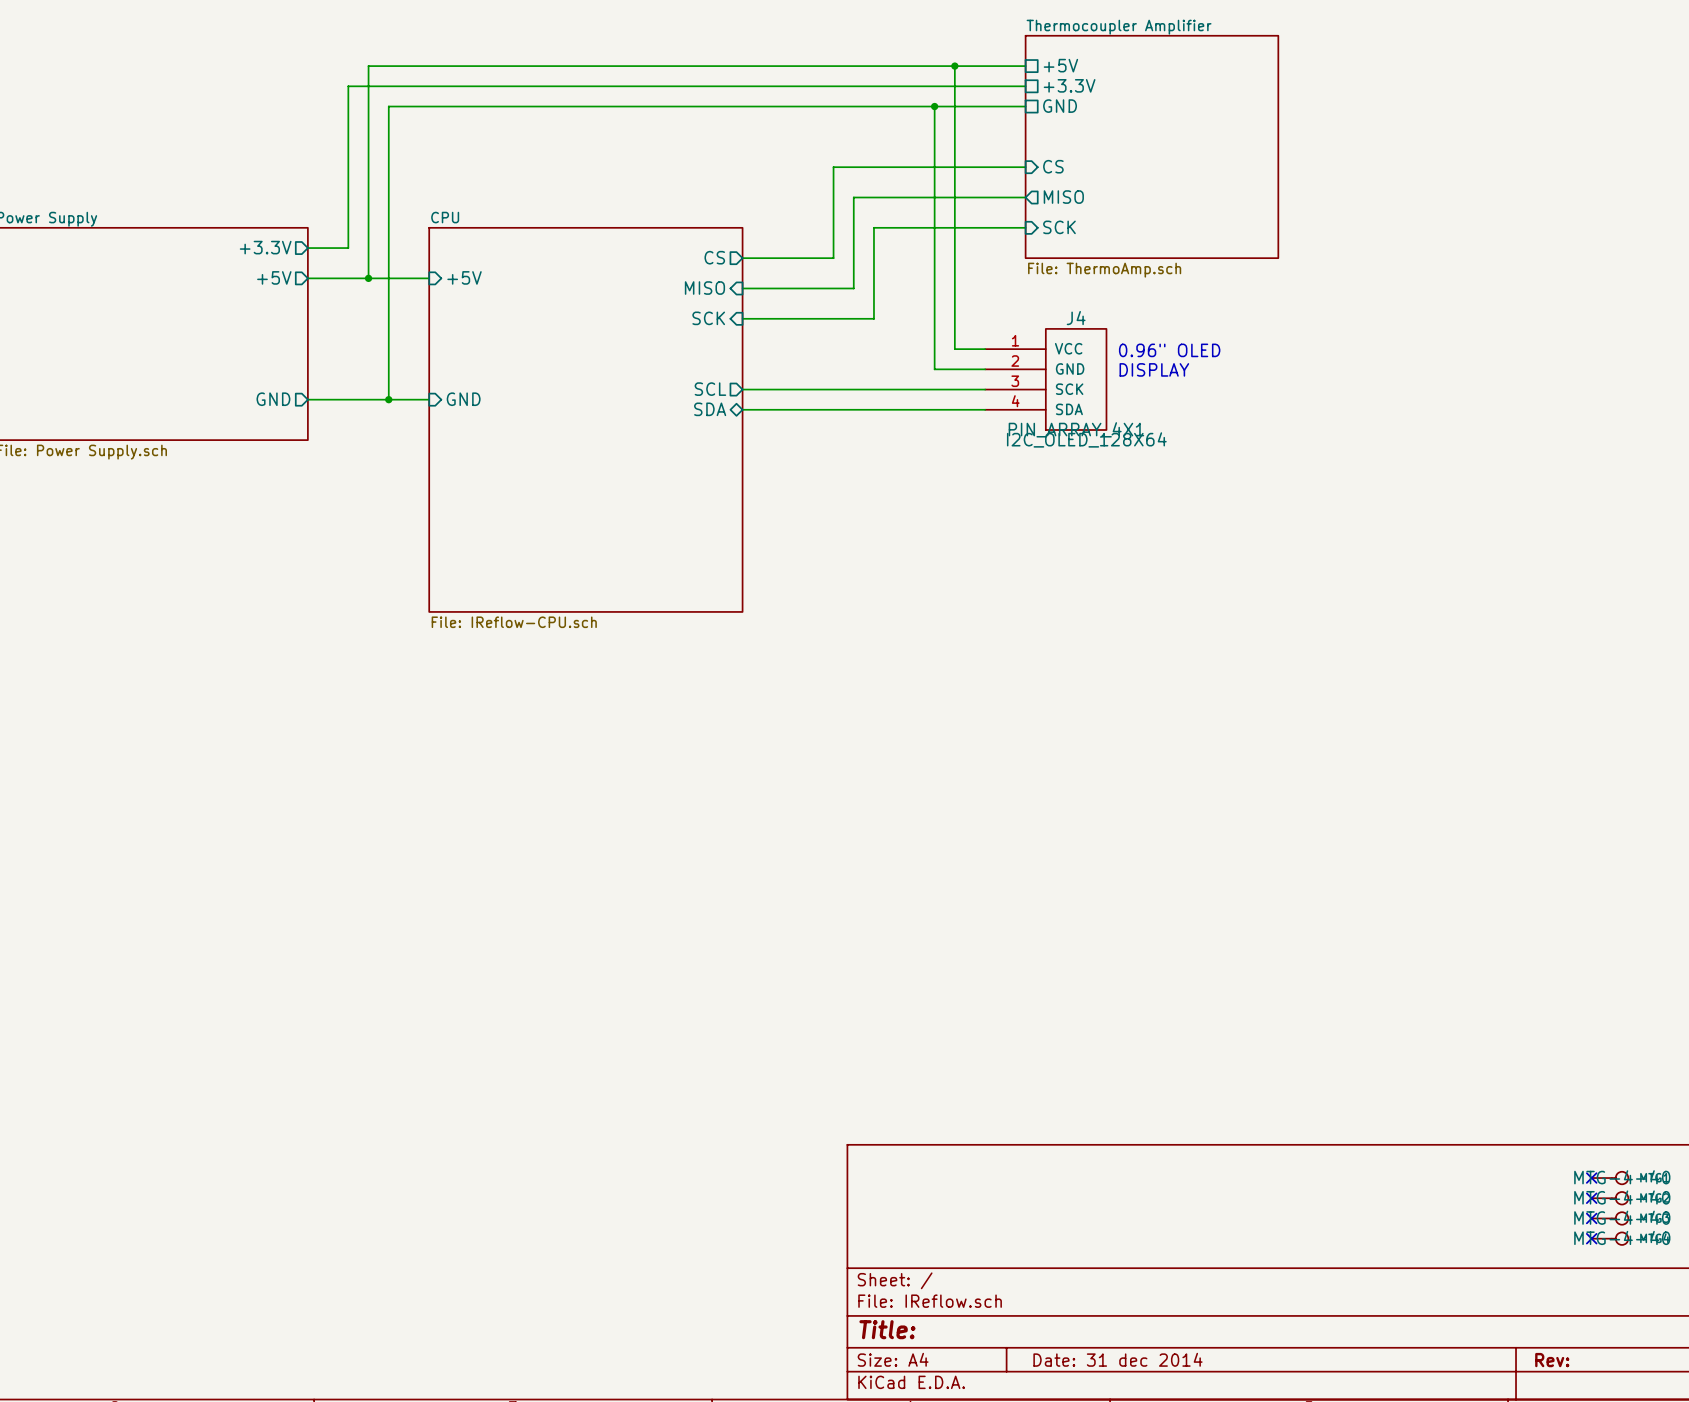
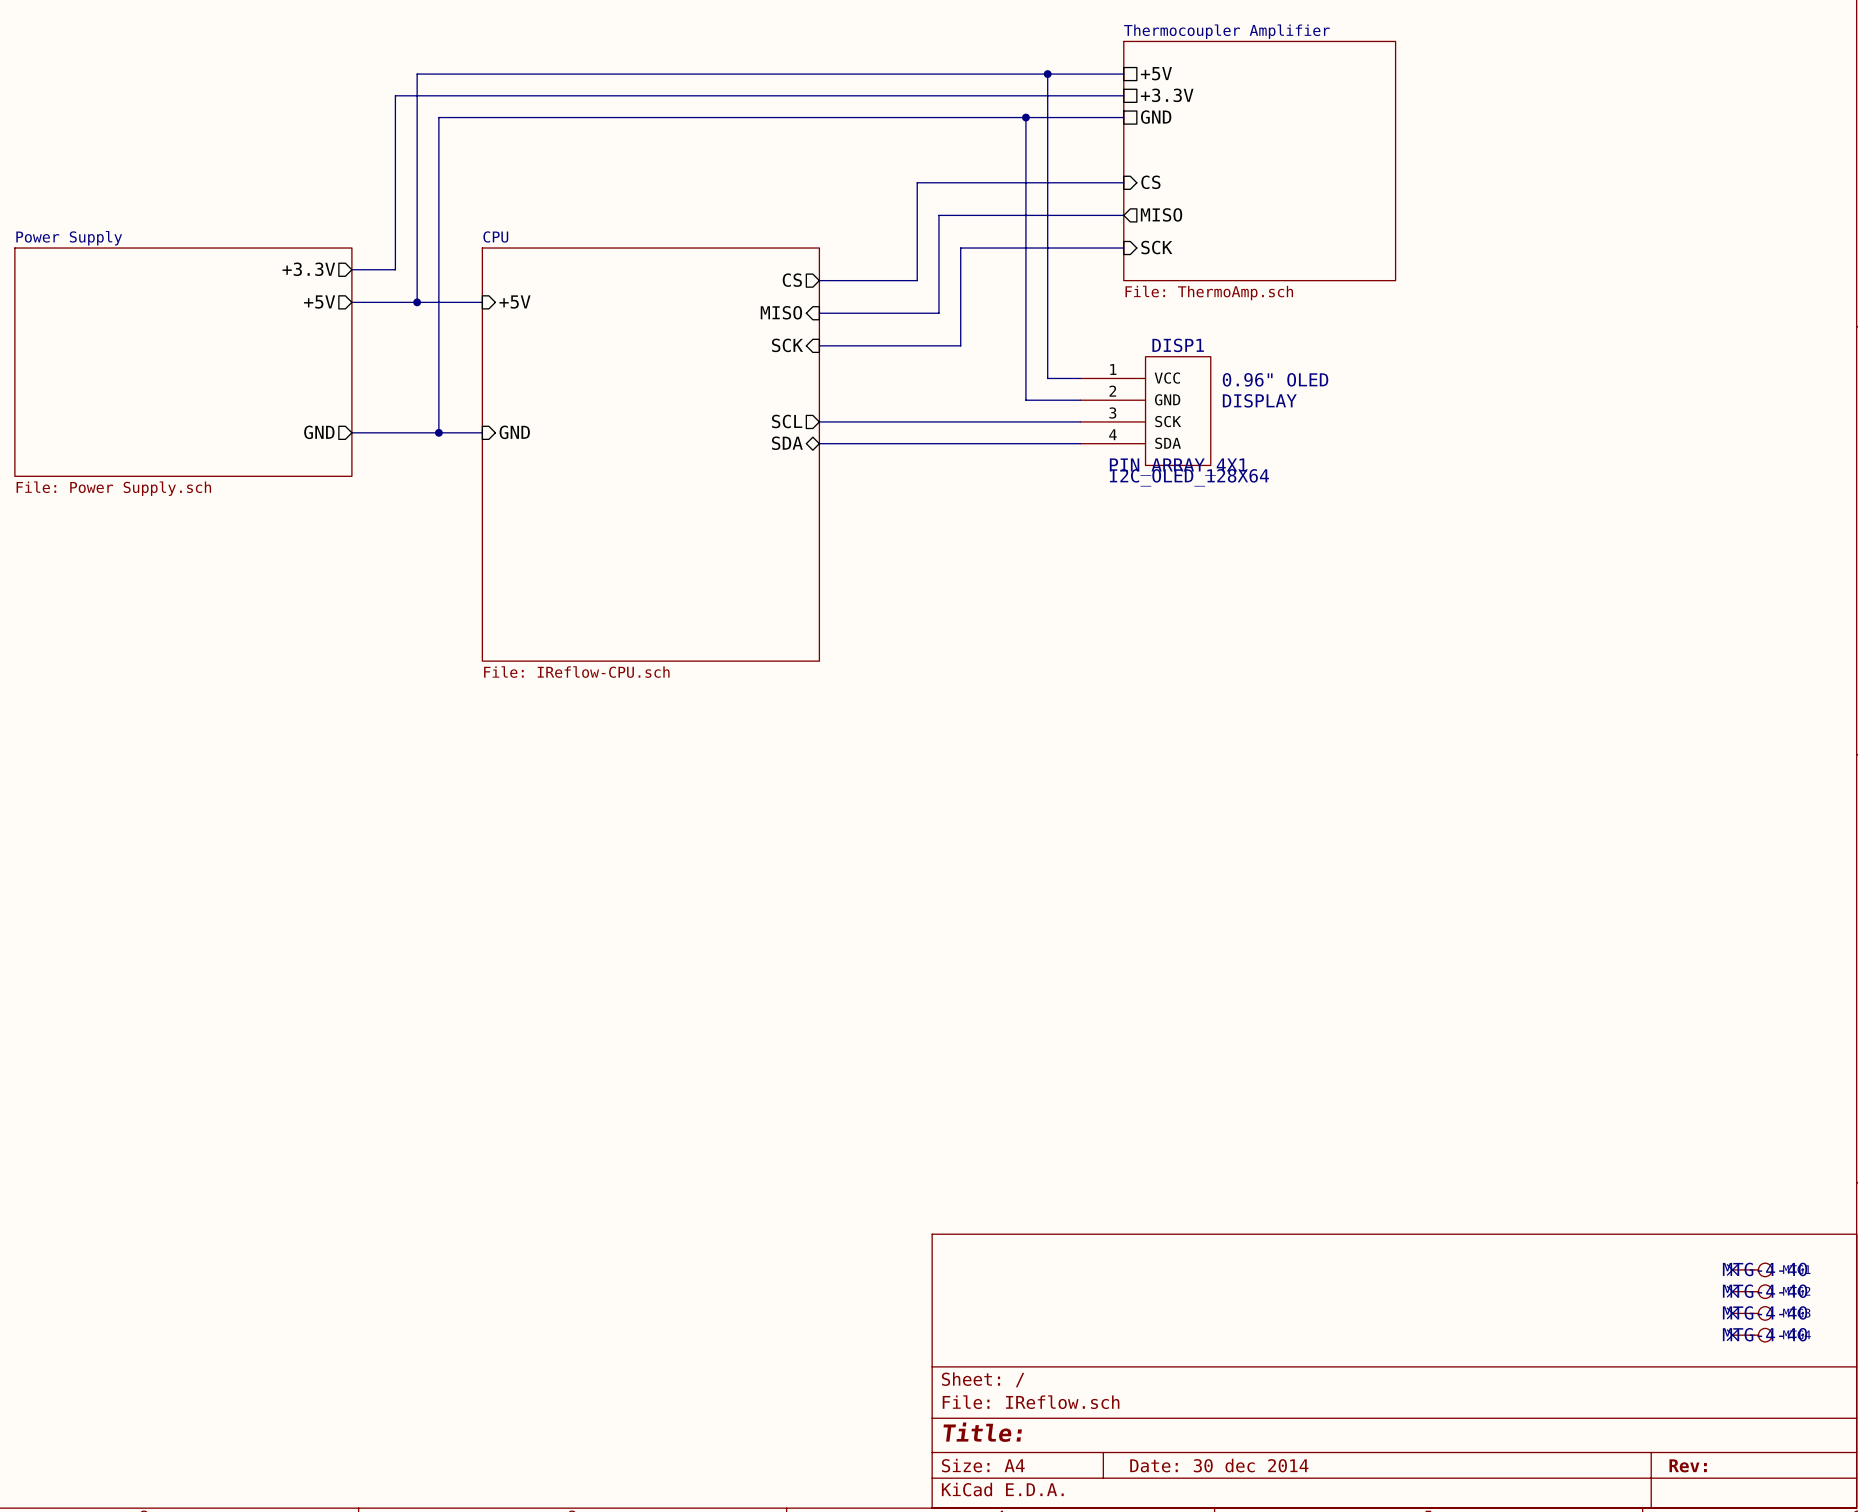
J4 name: J4 (1076, 318) -> DISP1 (1178, 345)
title block: Date: 31 dec 2014 (1117, 1359) -> Date: 30 dec 2014 (1219, 1465)

